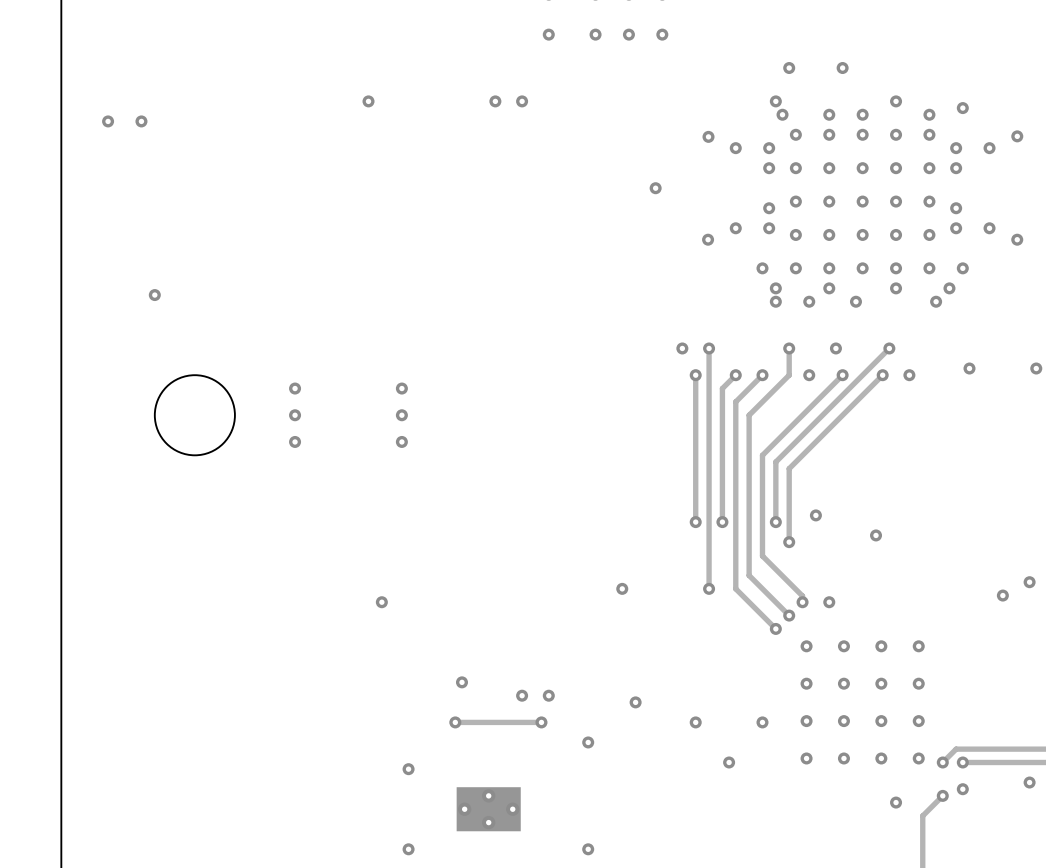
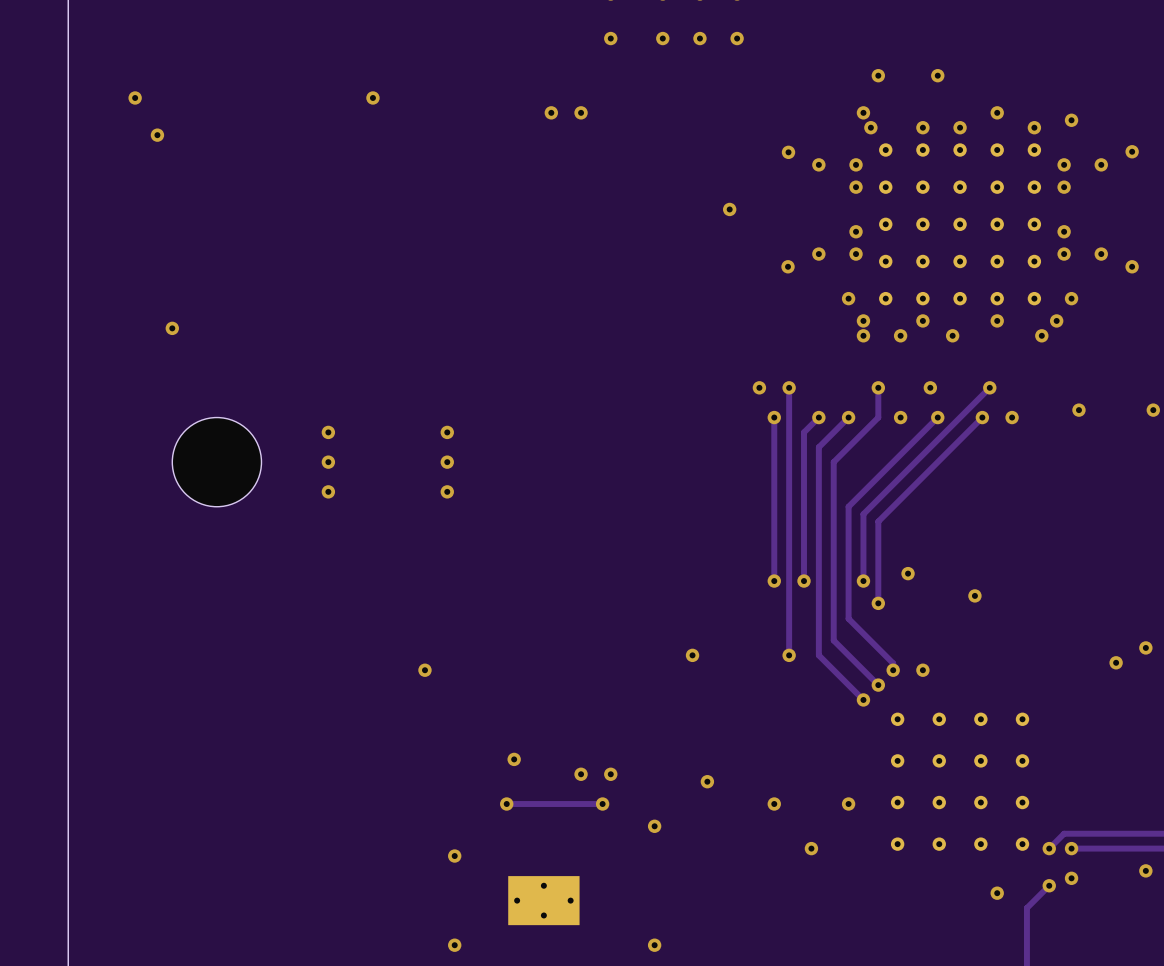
via position: (368, 101) -> (372, 97)
via position: (108, 121) -> (135, 97)

